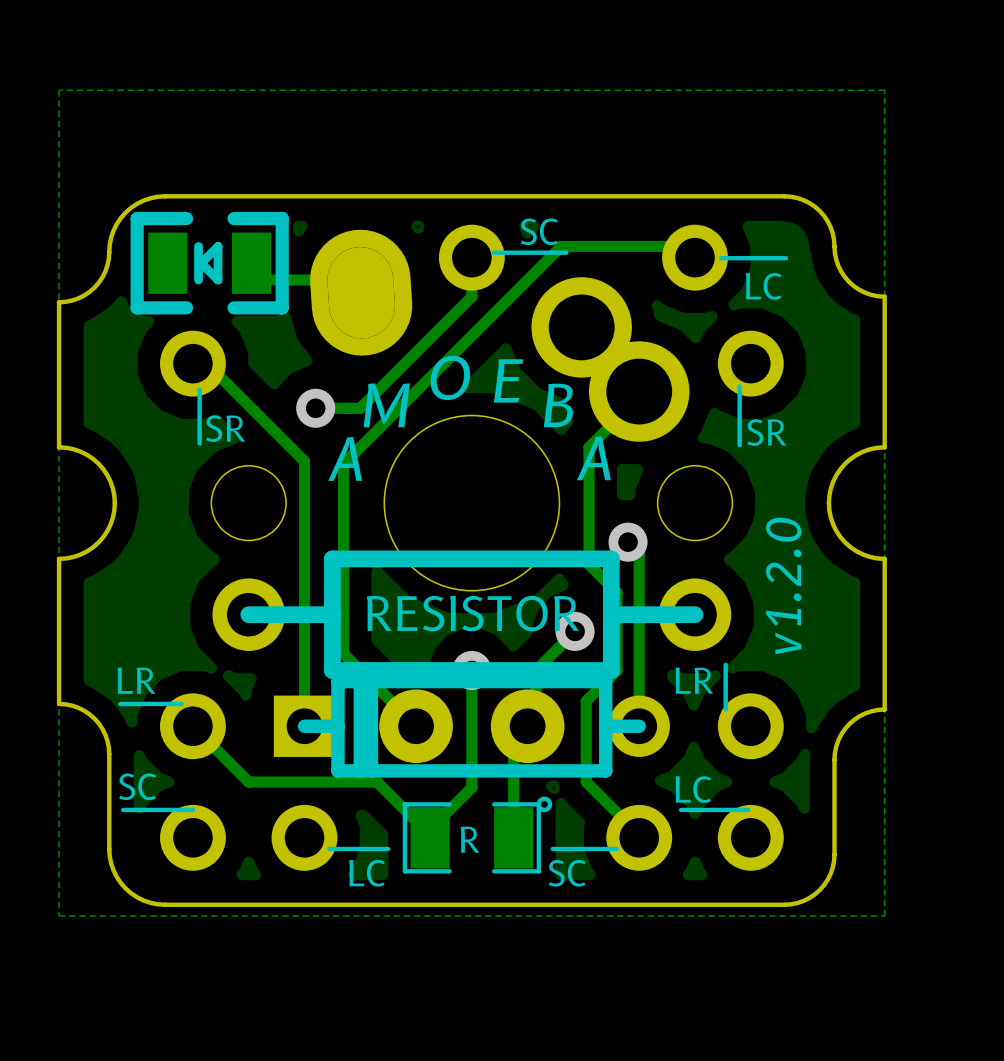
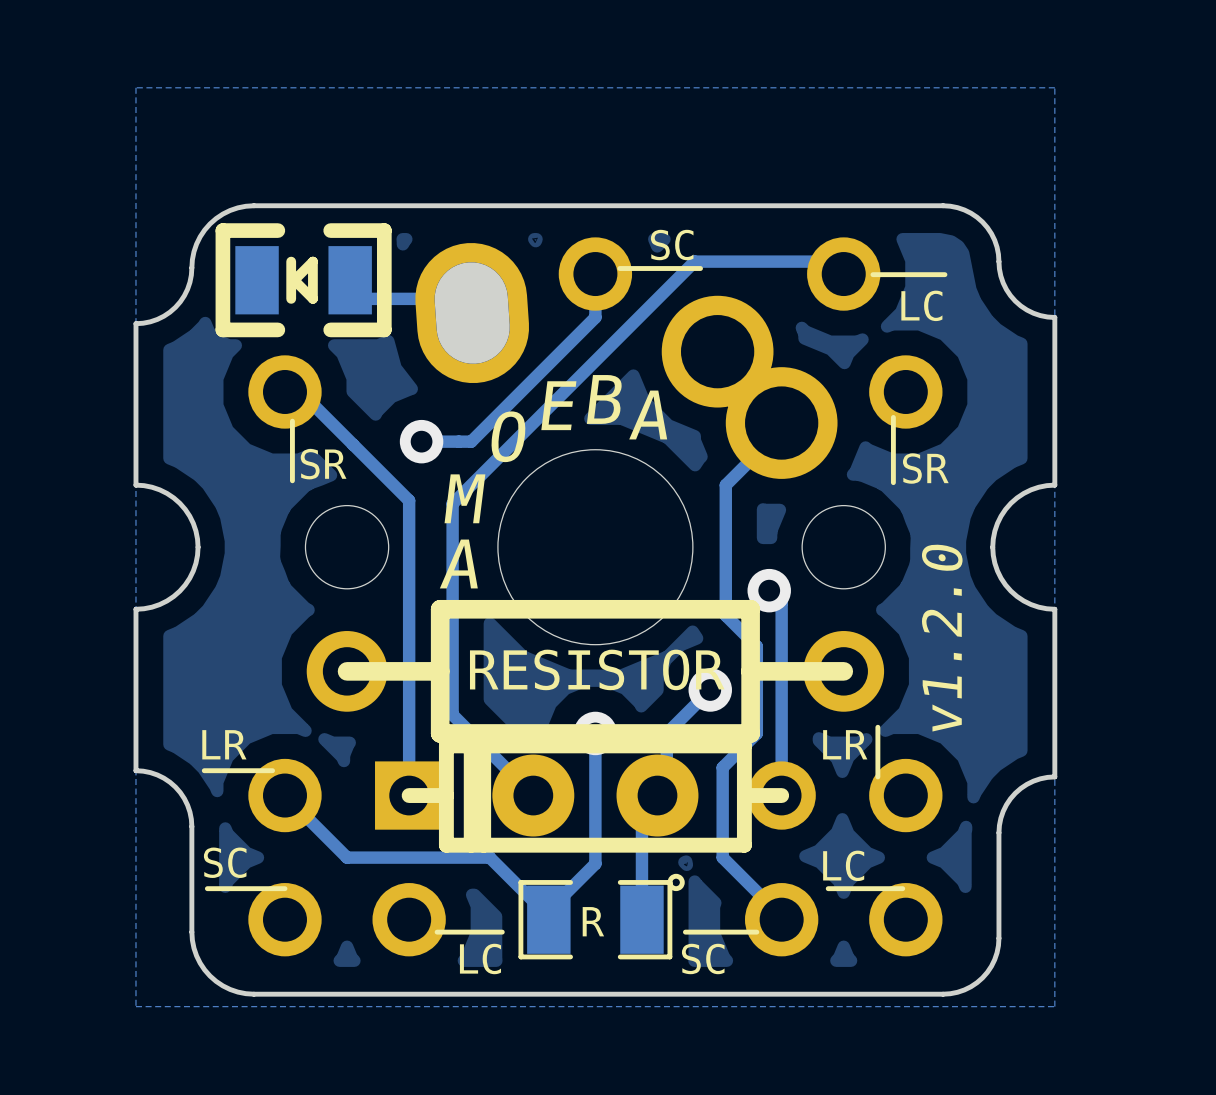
text position: O (450, 377) -> O (508, 436)
text position: E (508, 380) -> E (558, 405)
text: none -> A (648, 415)
text position: M (386, 405) -> M (464, 498)
text position: B (558, 405) -> B (604, 399)
text position: A (345, 458) -> A (458, 564)
text: A (593, 458) -> none

